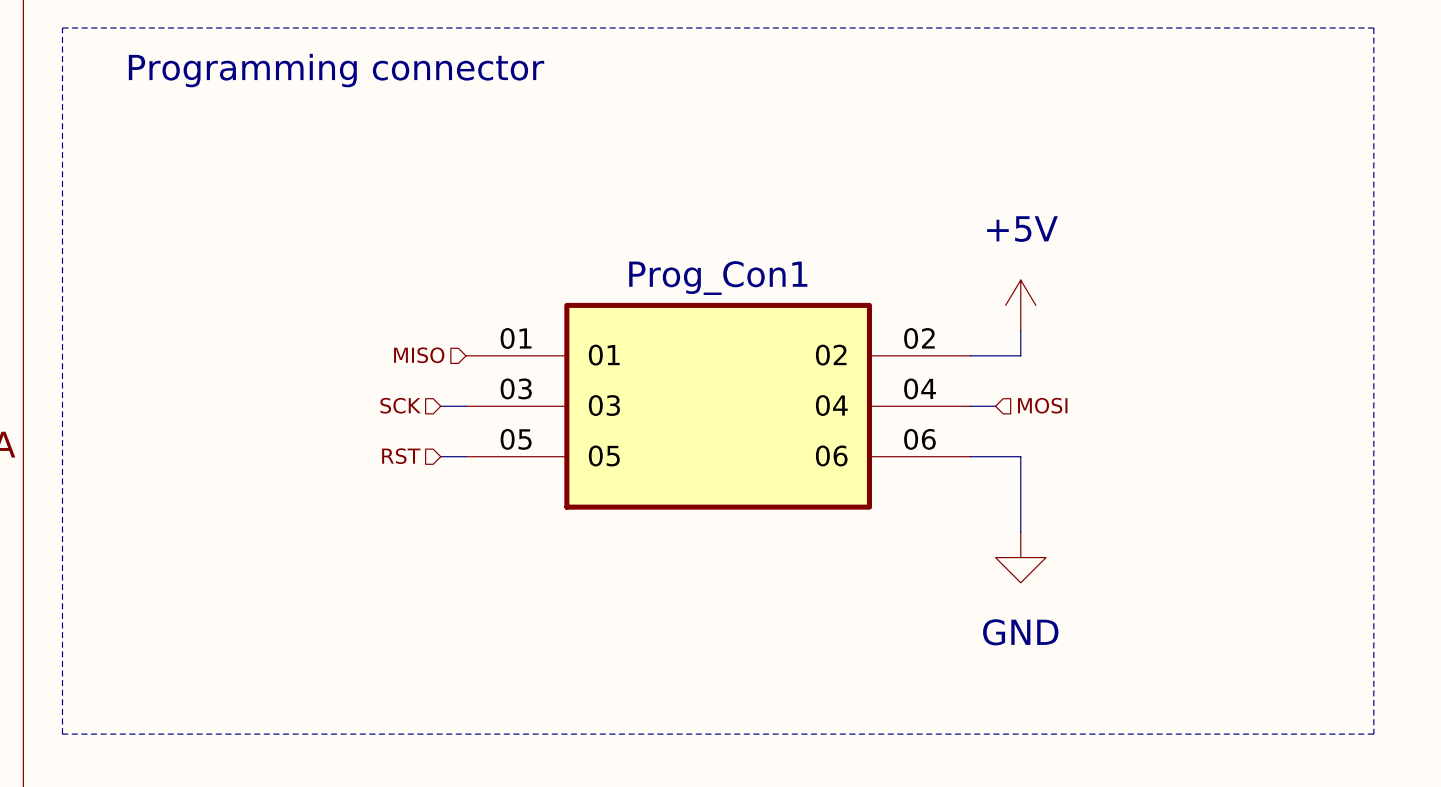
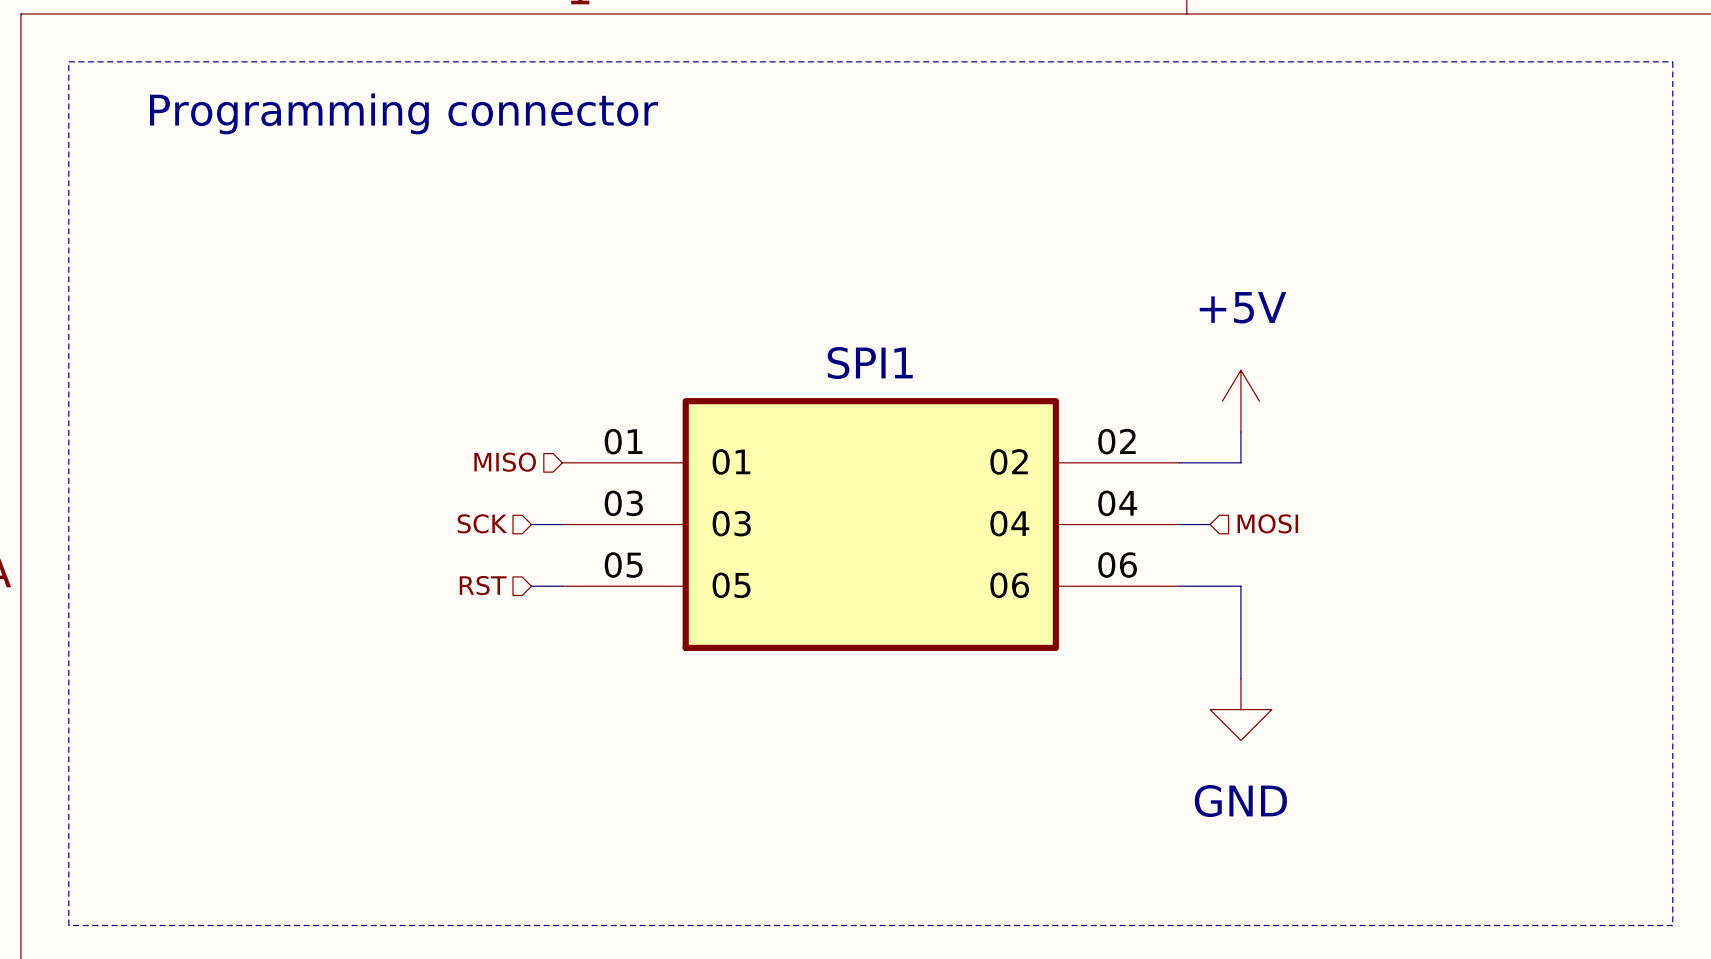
Prog_Con1 name: Prog_Con1 (718, 278) -> SPI1 (870, 363)

